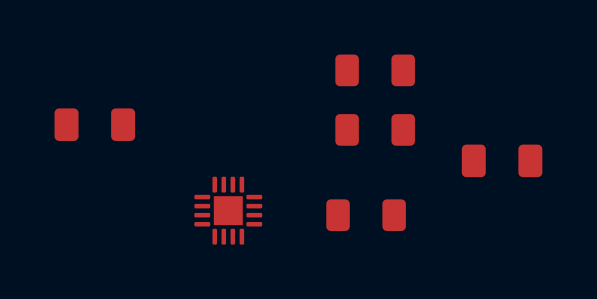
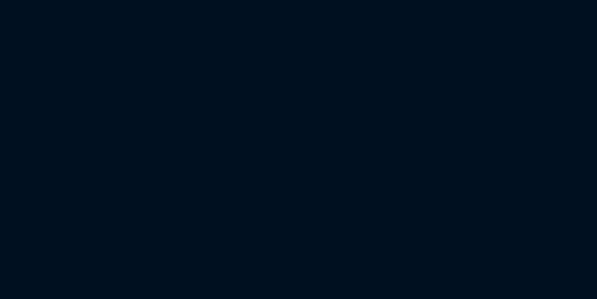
part: (375, 70) -> none
part: (94, 124) -> none
part: (375, 129) -> none
part: (502, 160) -> none
part: (228, 210) -> none
part: (366, 215) -> none

